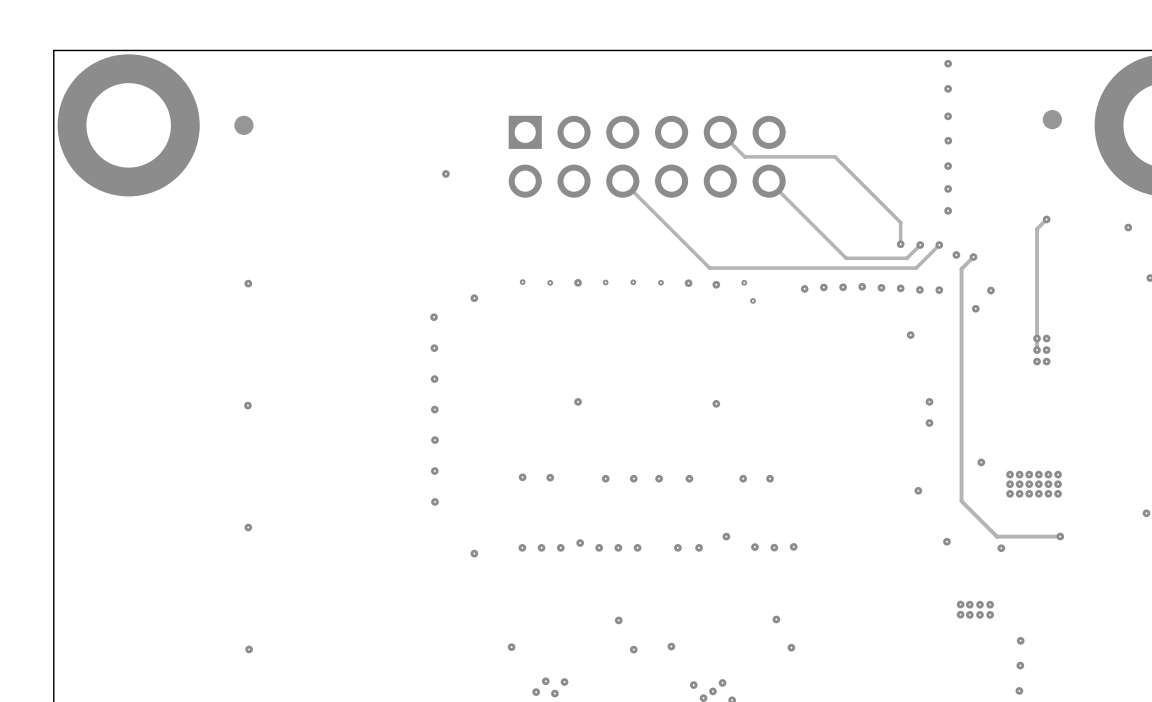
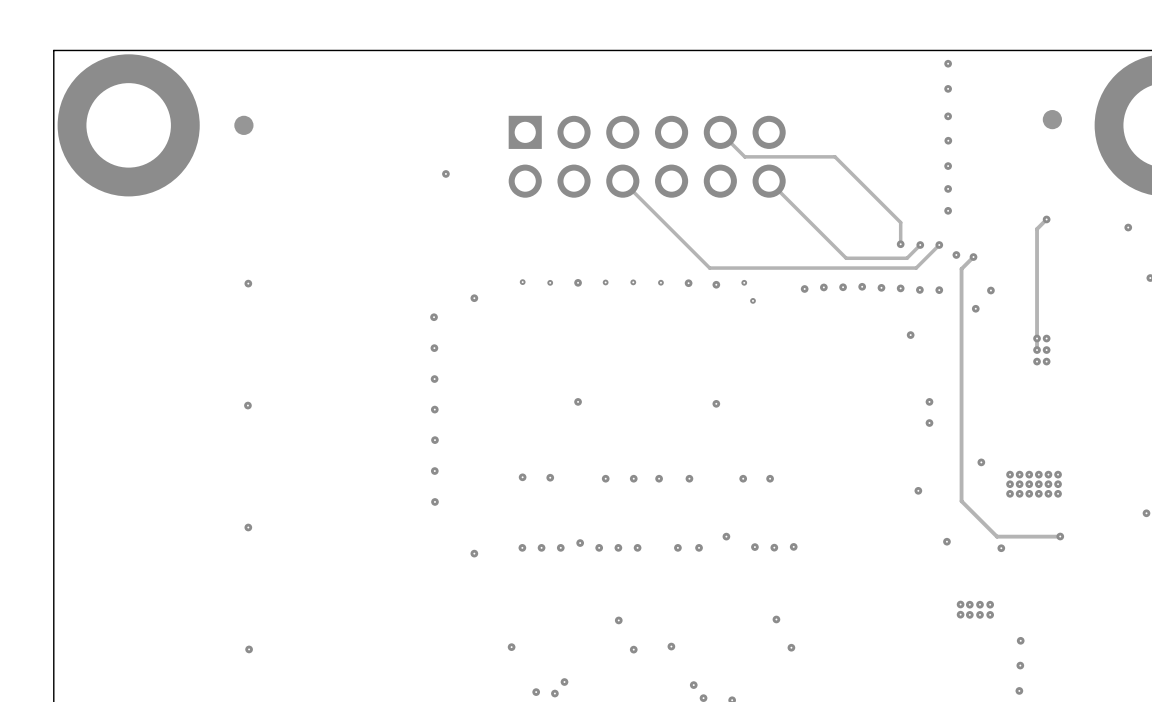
via: (545, 681) -> none
via: (722, 682) -> none
via: (712, 691) -> none

